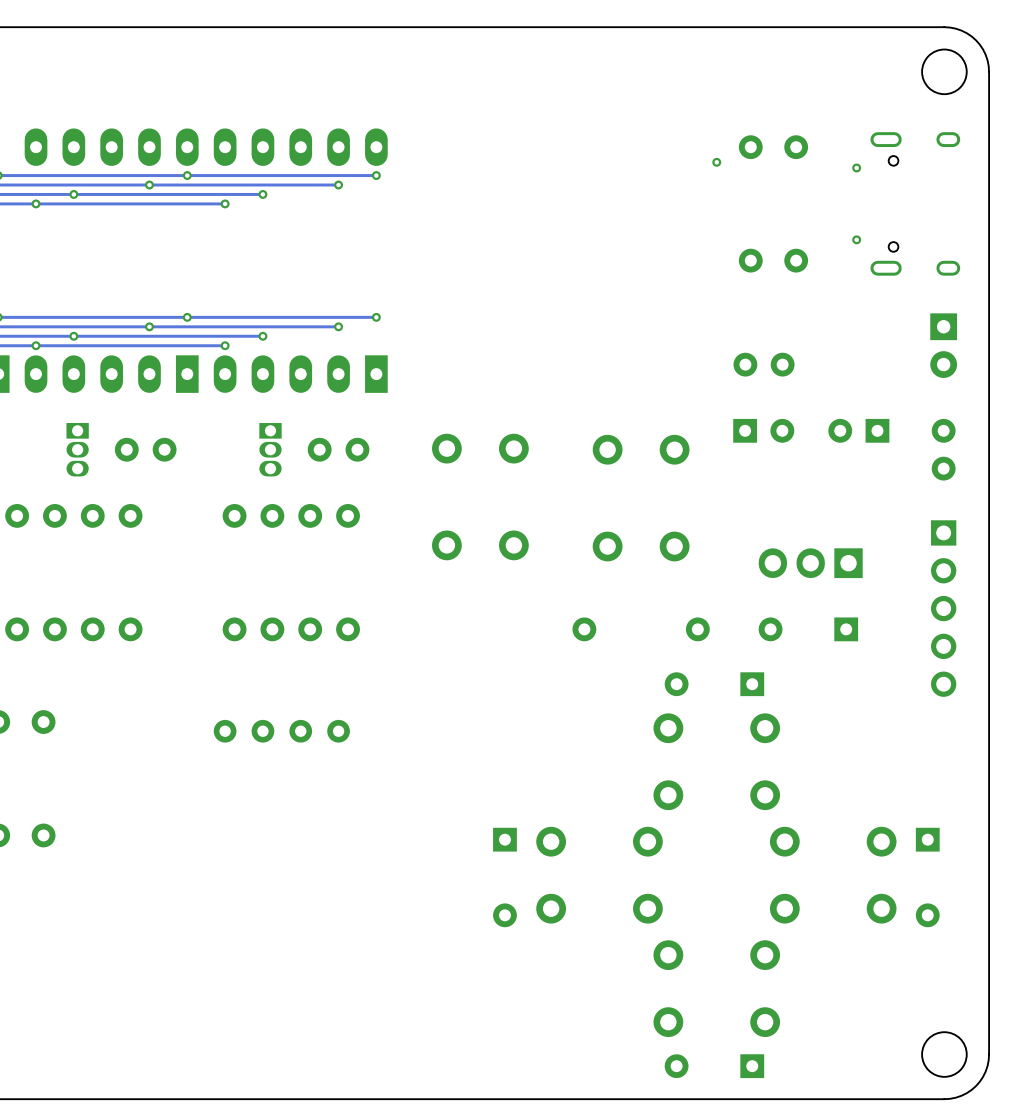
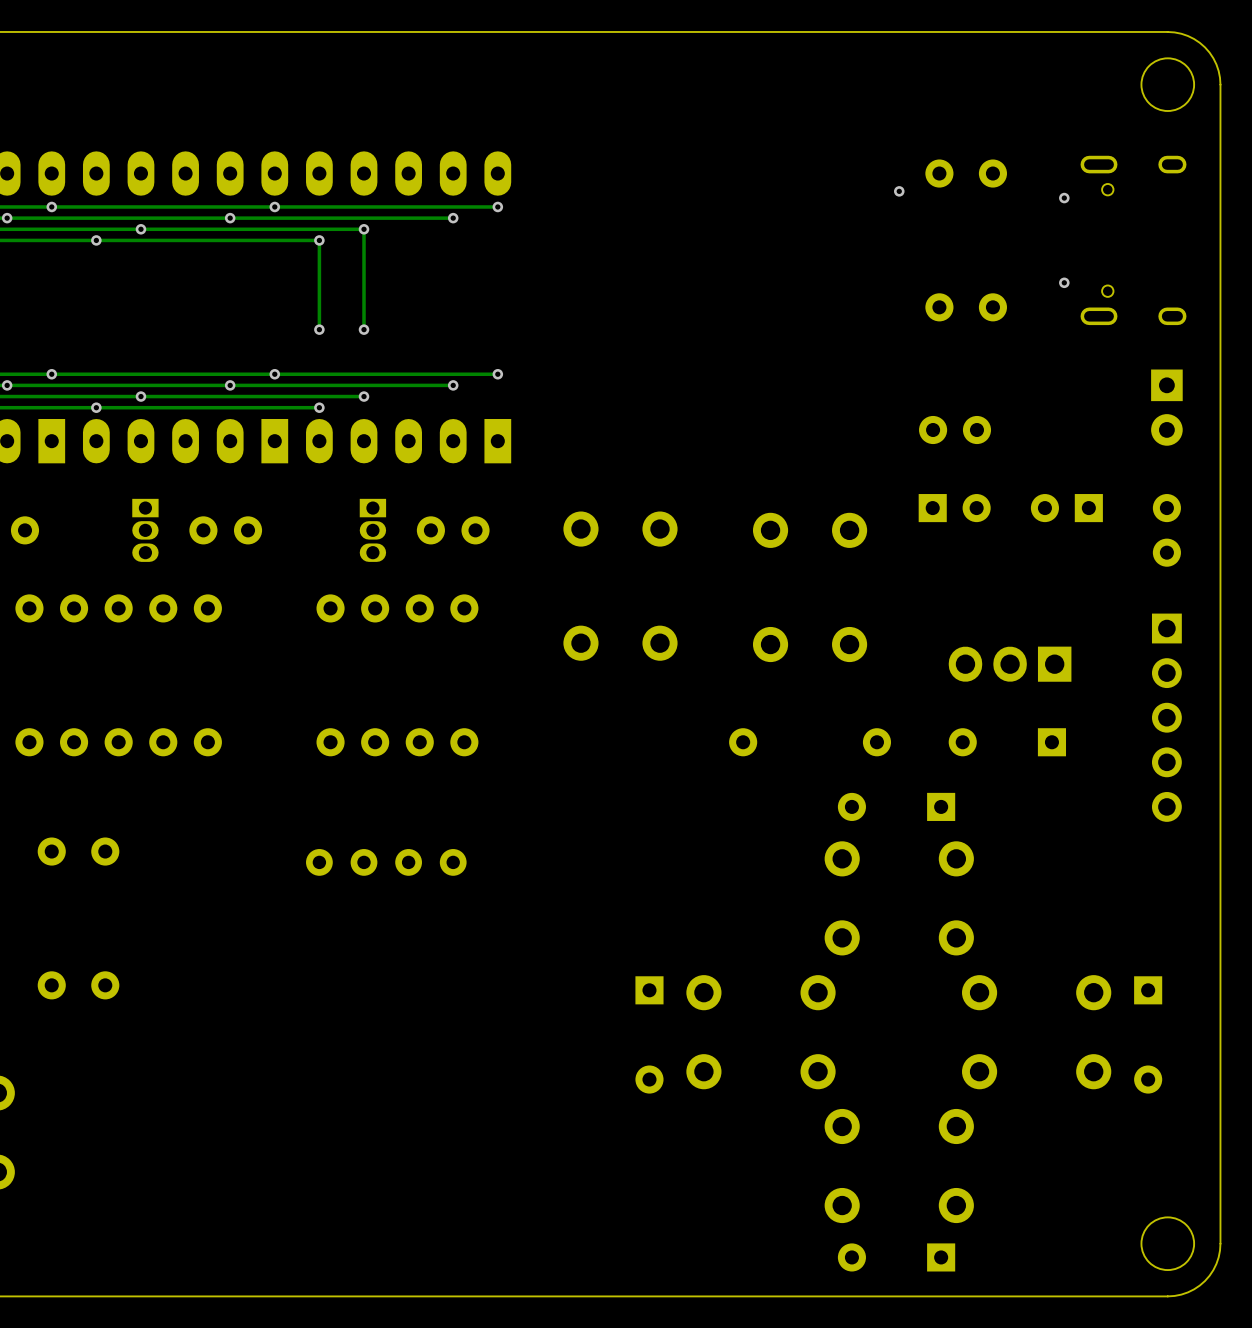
track: none -> (364, 229) (364, 329)
track: none -> (319, 240) (319, 329)
via: none -> (319, 329)
via: none -> (364, 329)

